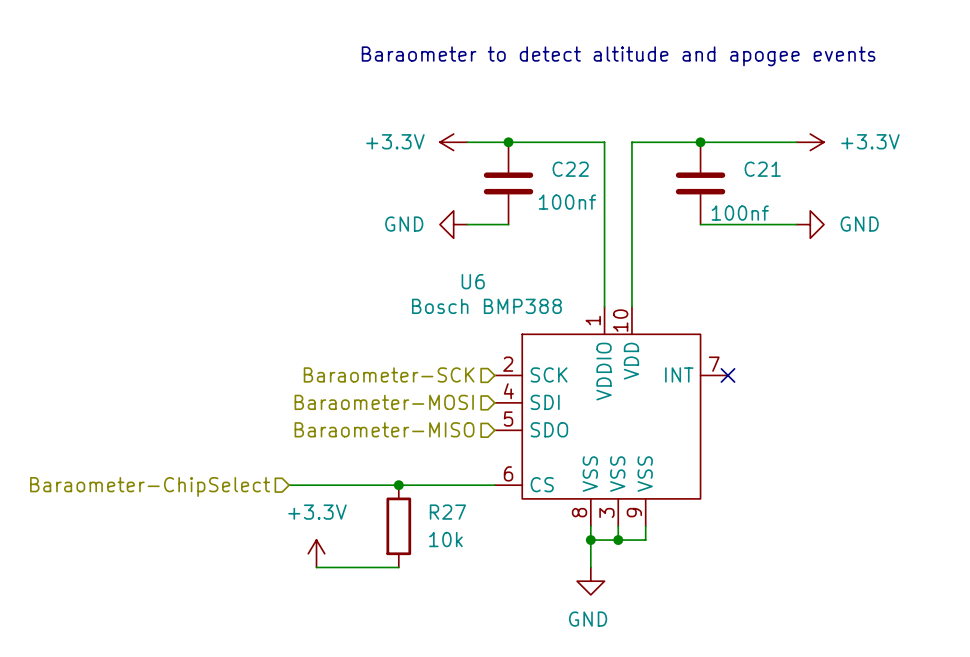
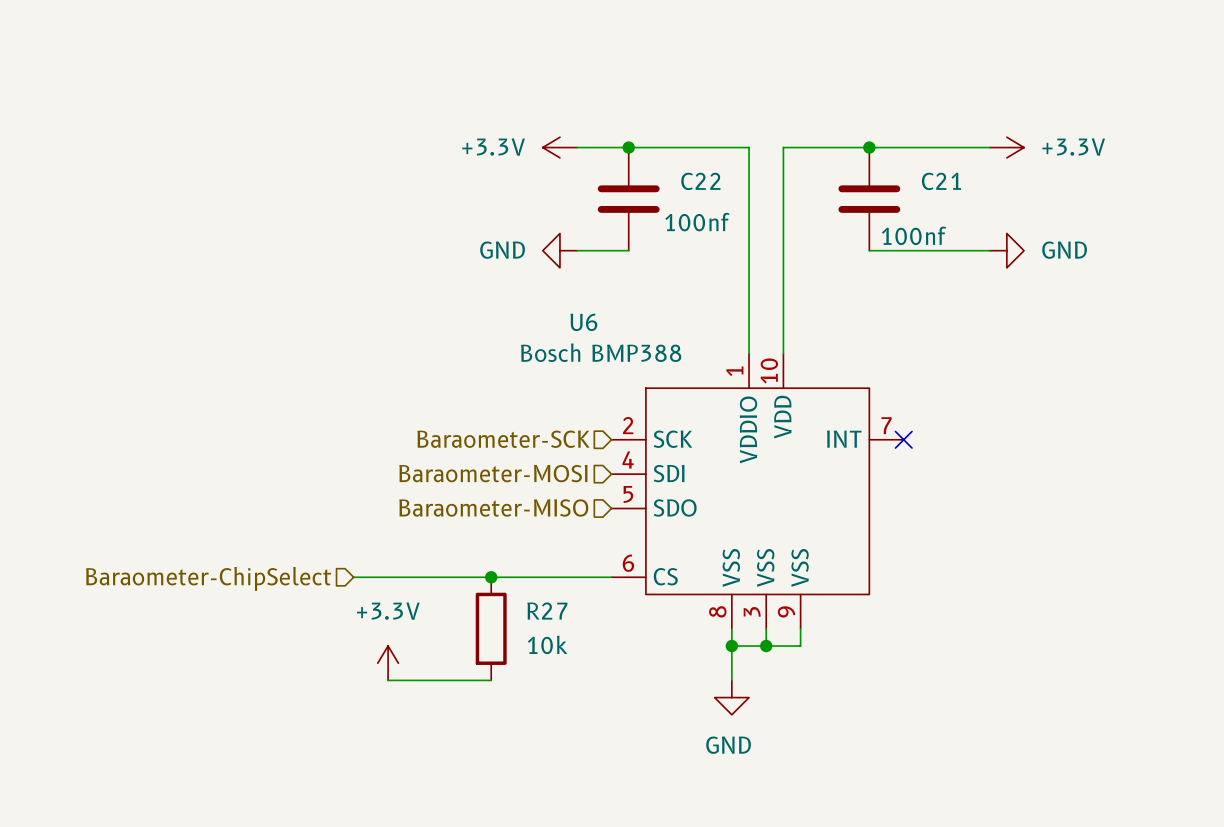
text: Baraometer to detect altitude and apogee events (618, 56) -> none

